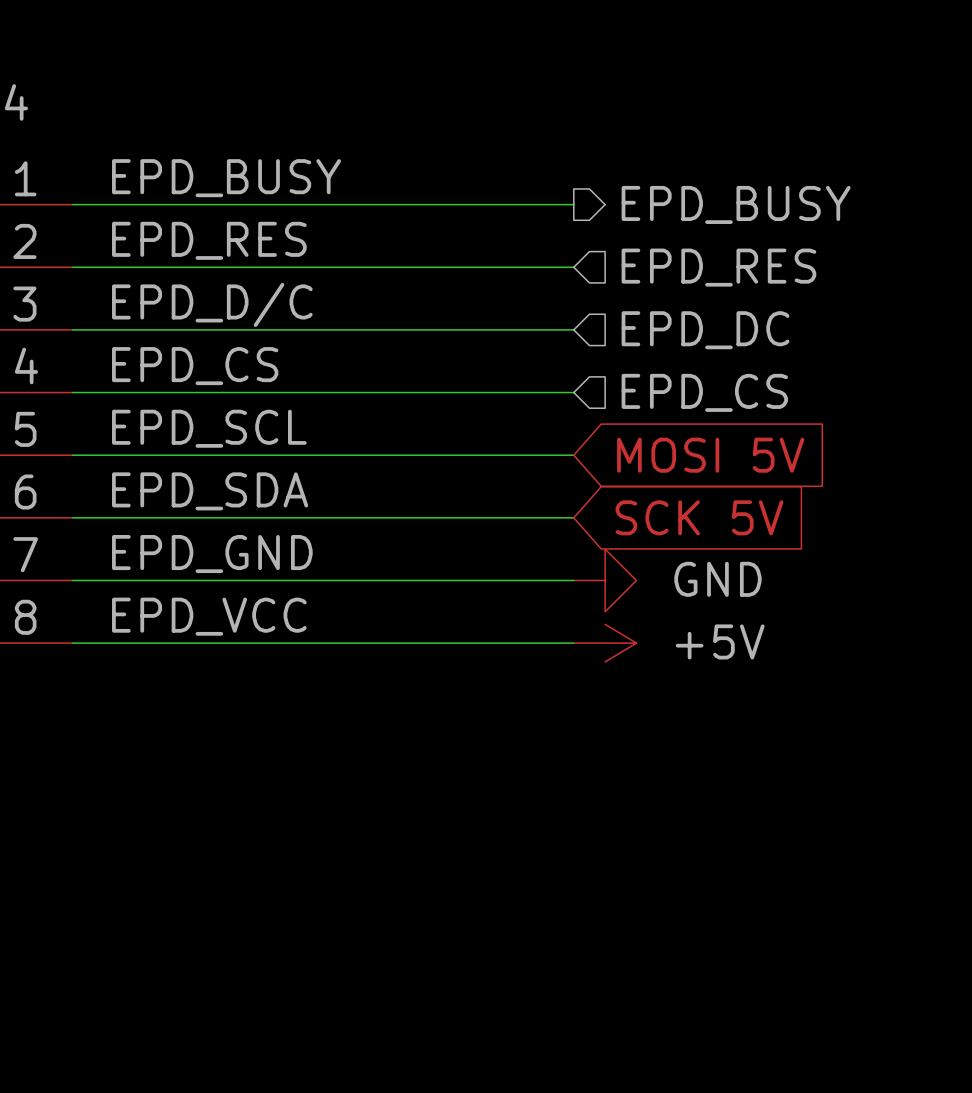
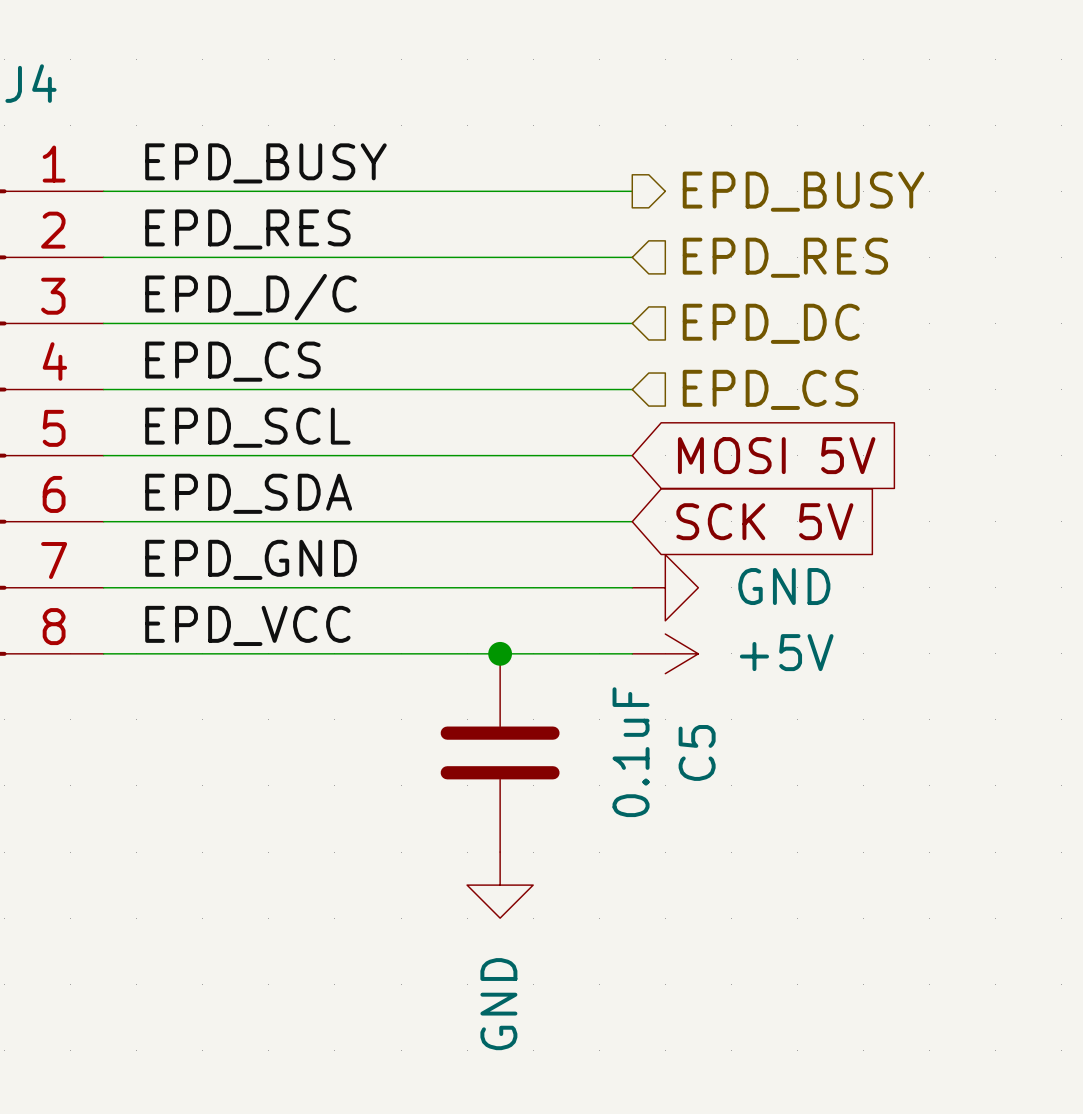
junction: none -> (500, 653)
C5: none -> 0.1uF (500, 752)
power symbol: none -> GND (500, 885)

